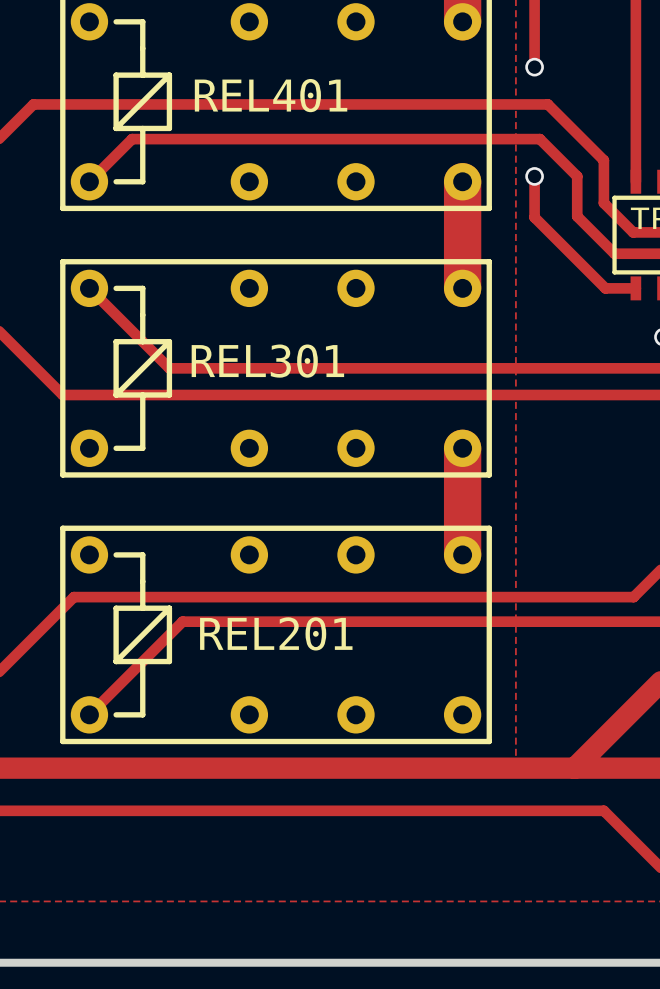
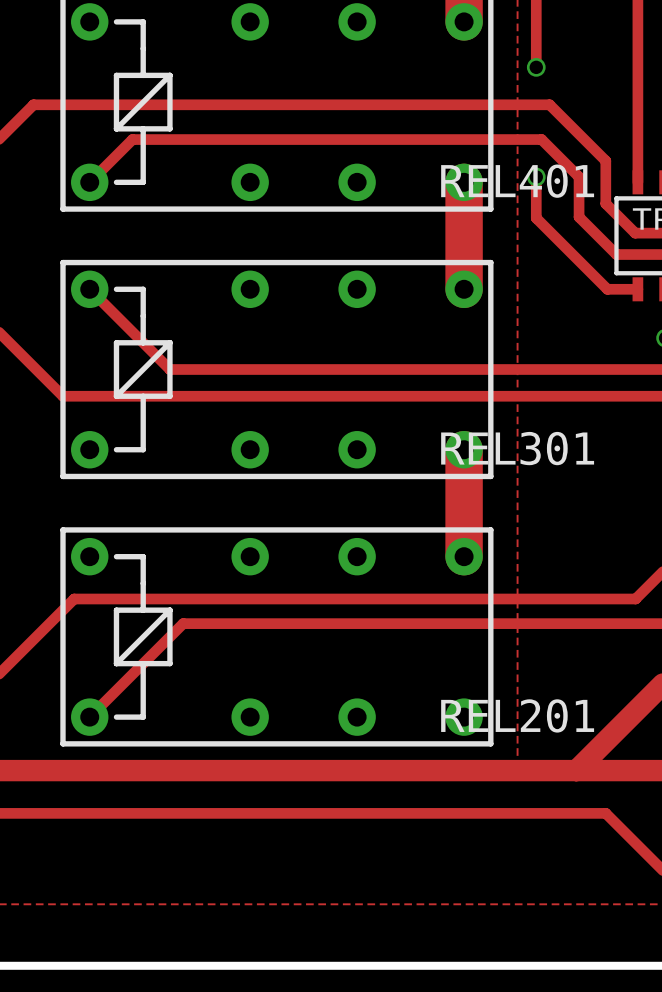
REL401 name position: REL401 (271, 95) -> REL401 (517, 181)
REL301 name position: REL301 (267, 361) -> REL301 (517, 448)
REL201 name position: REL201 (276, 633) -> REL201 (517, 715)

